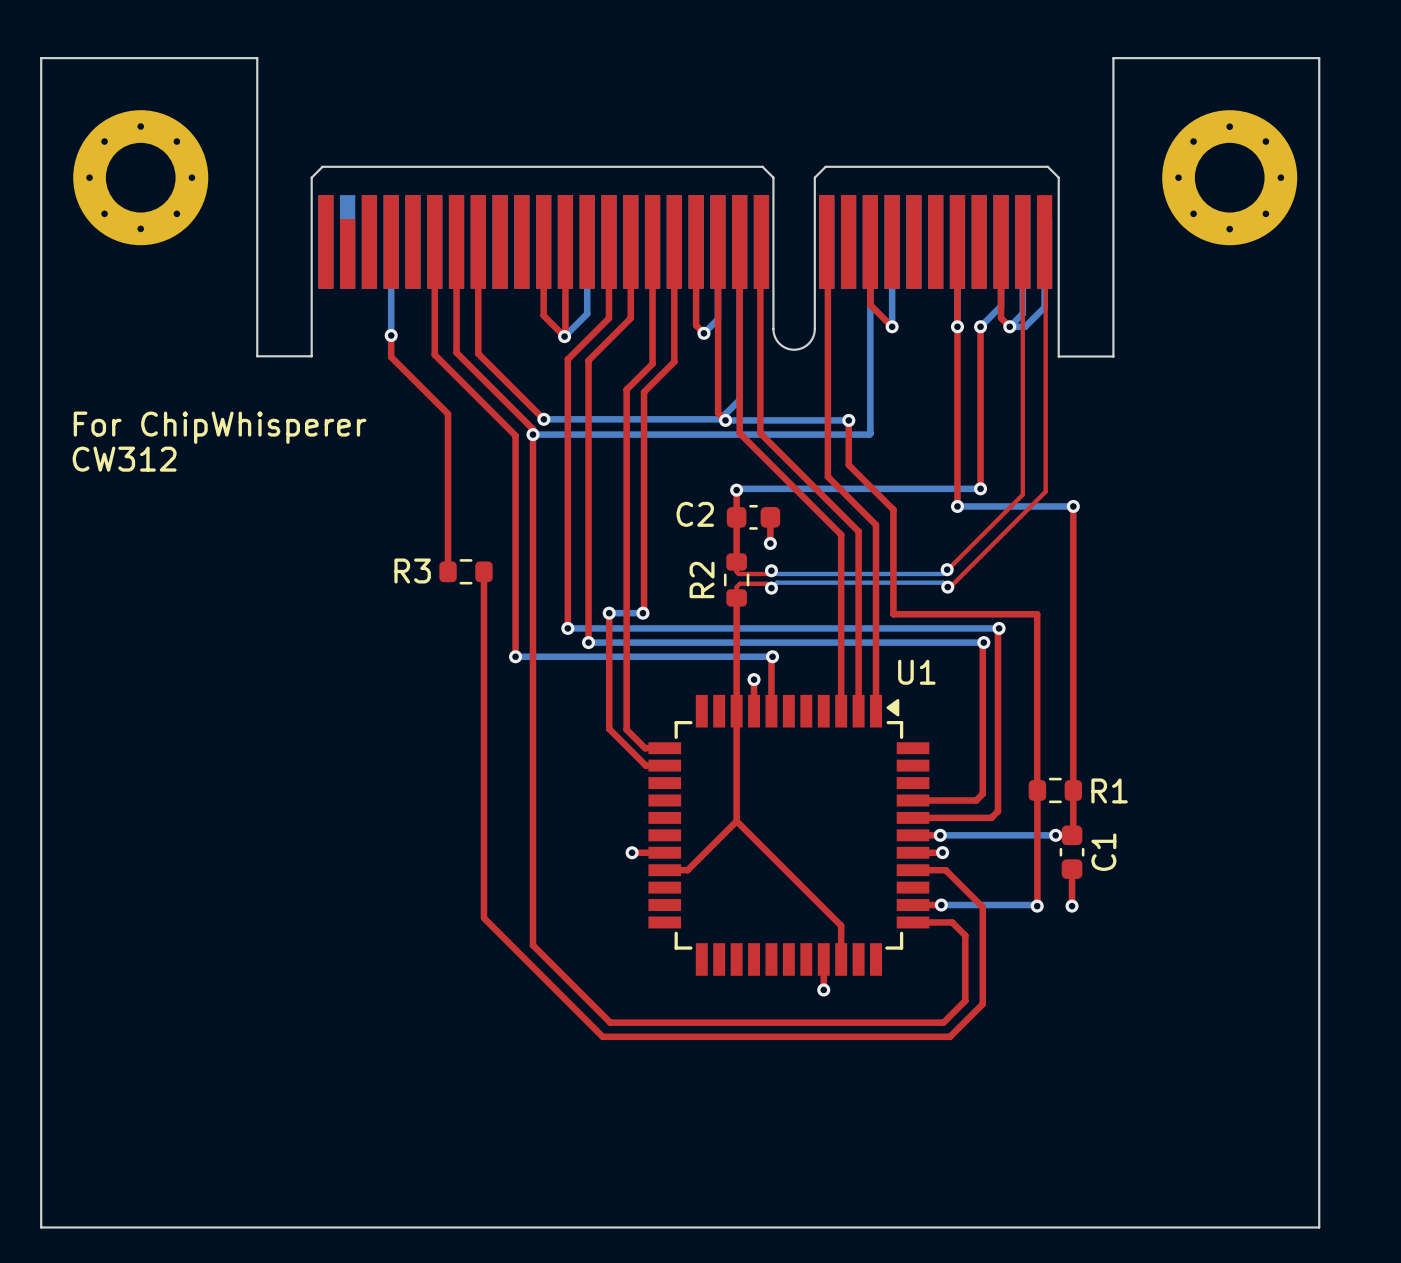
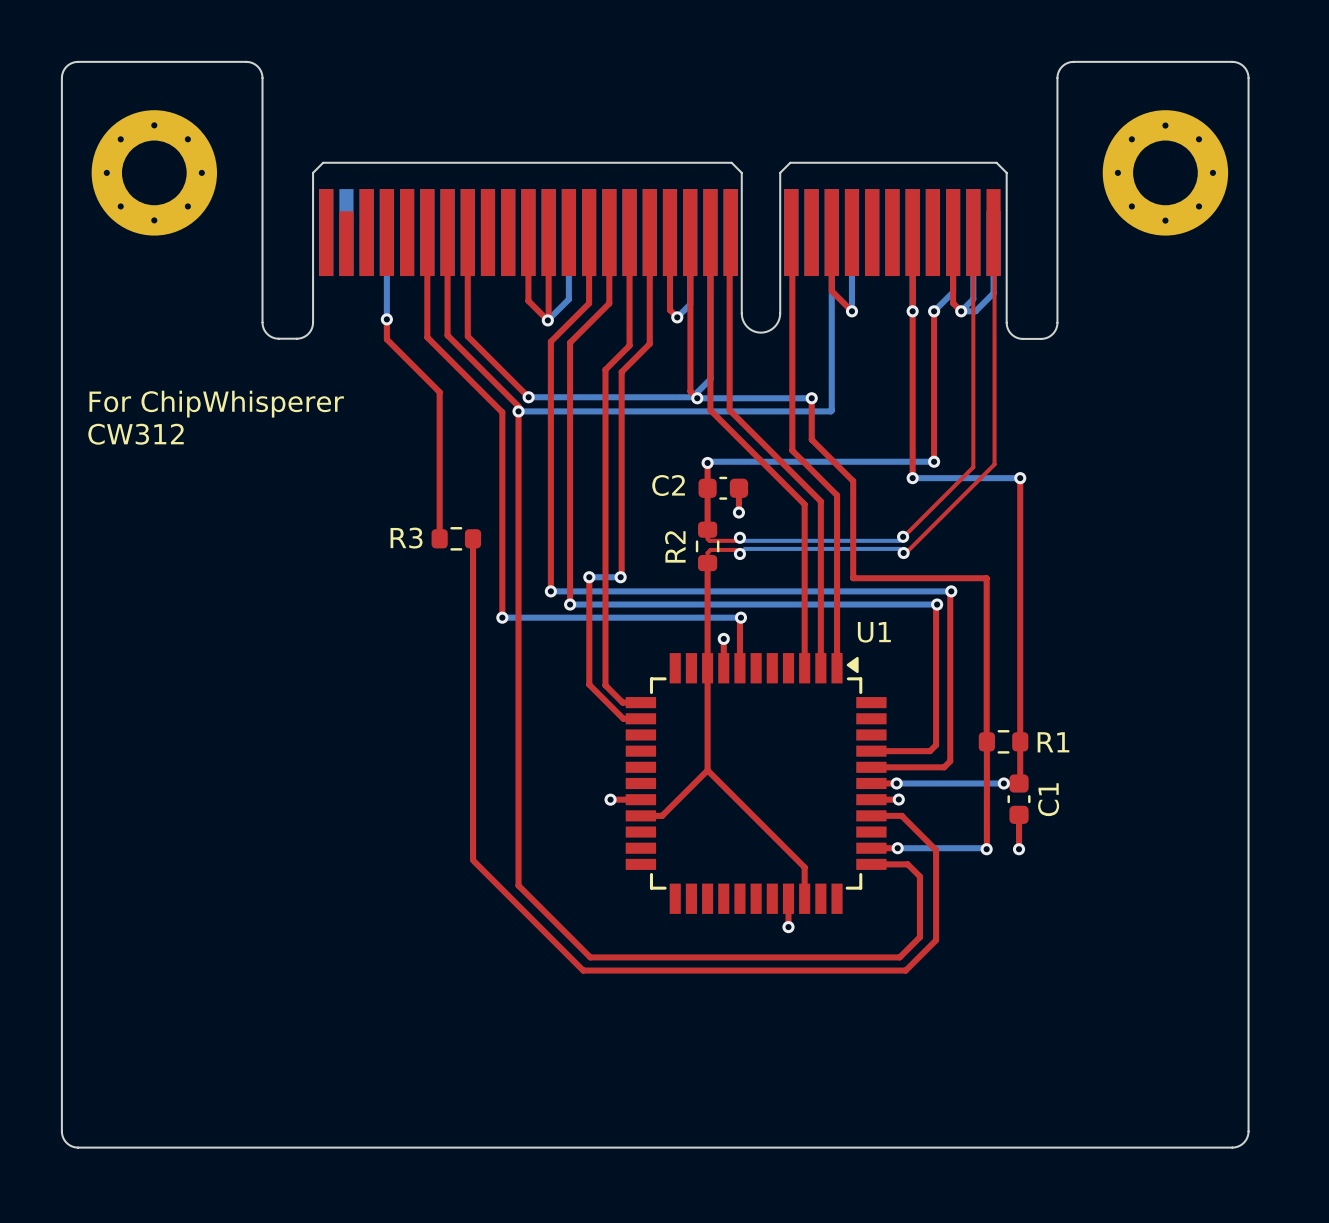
part footprint: [40, 57, 1321, 1229] -> [60, 60, 1250, 1149]

